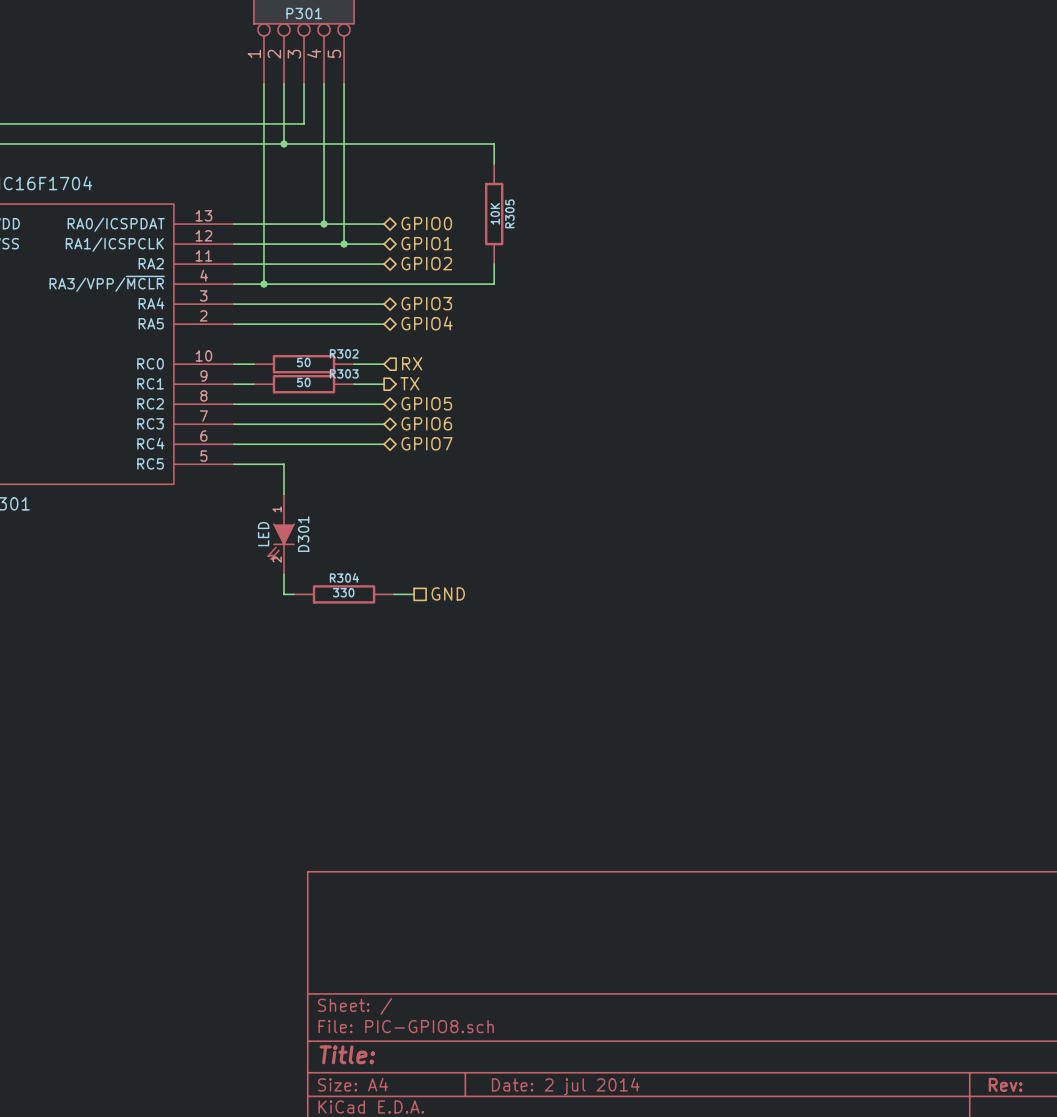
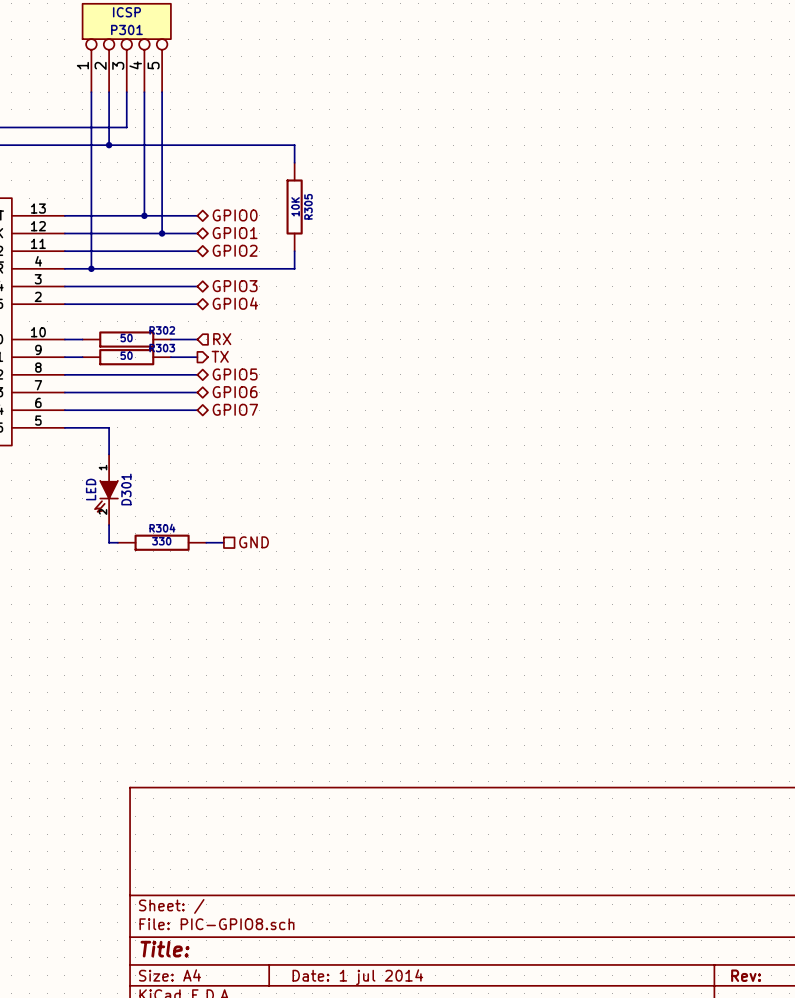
title block: Date: 2 jul 2014 (565, 1086) -> Date: 1 jul 2014 (357, 977)

